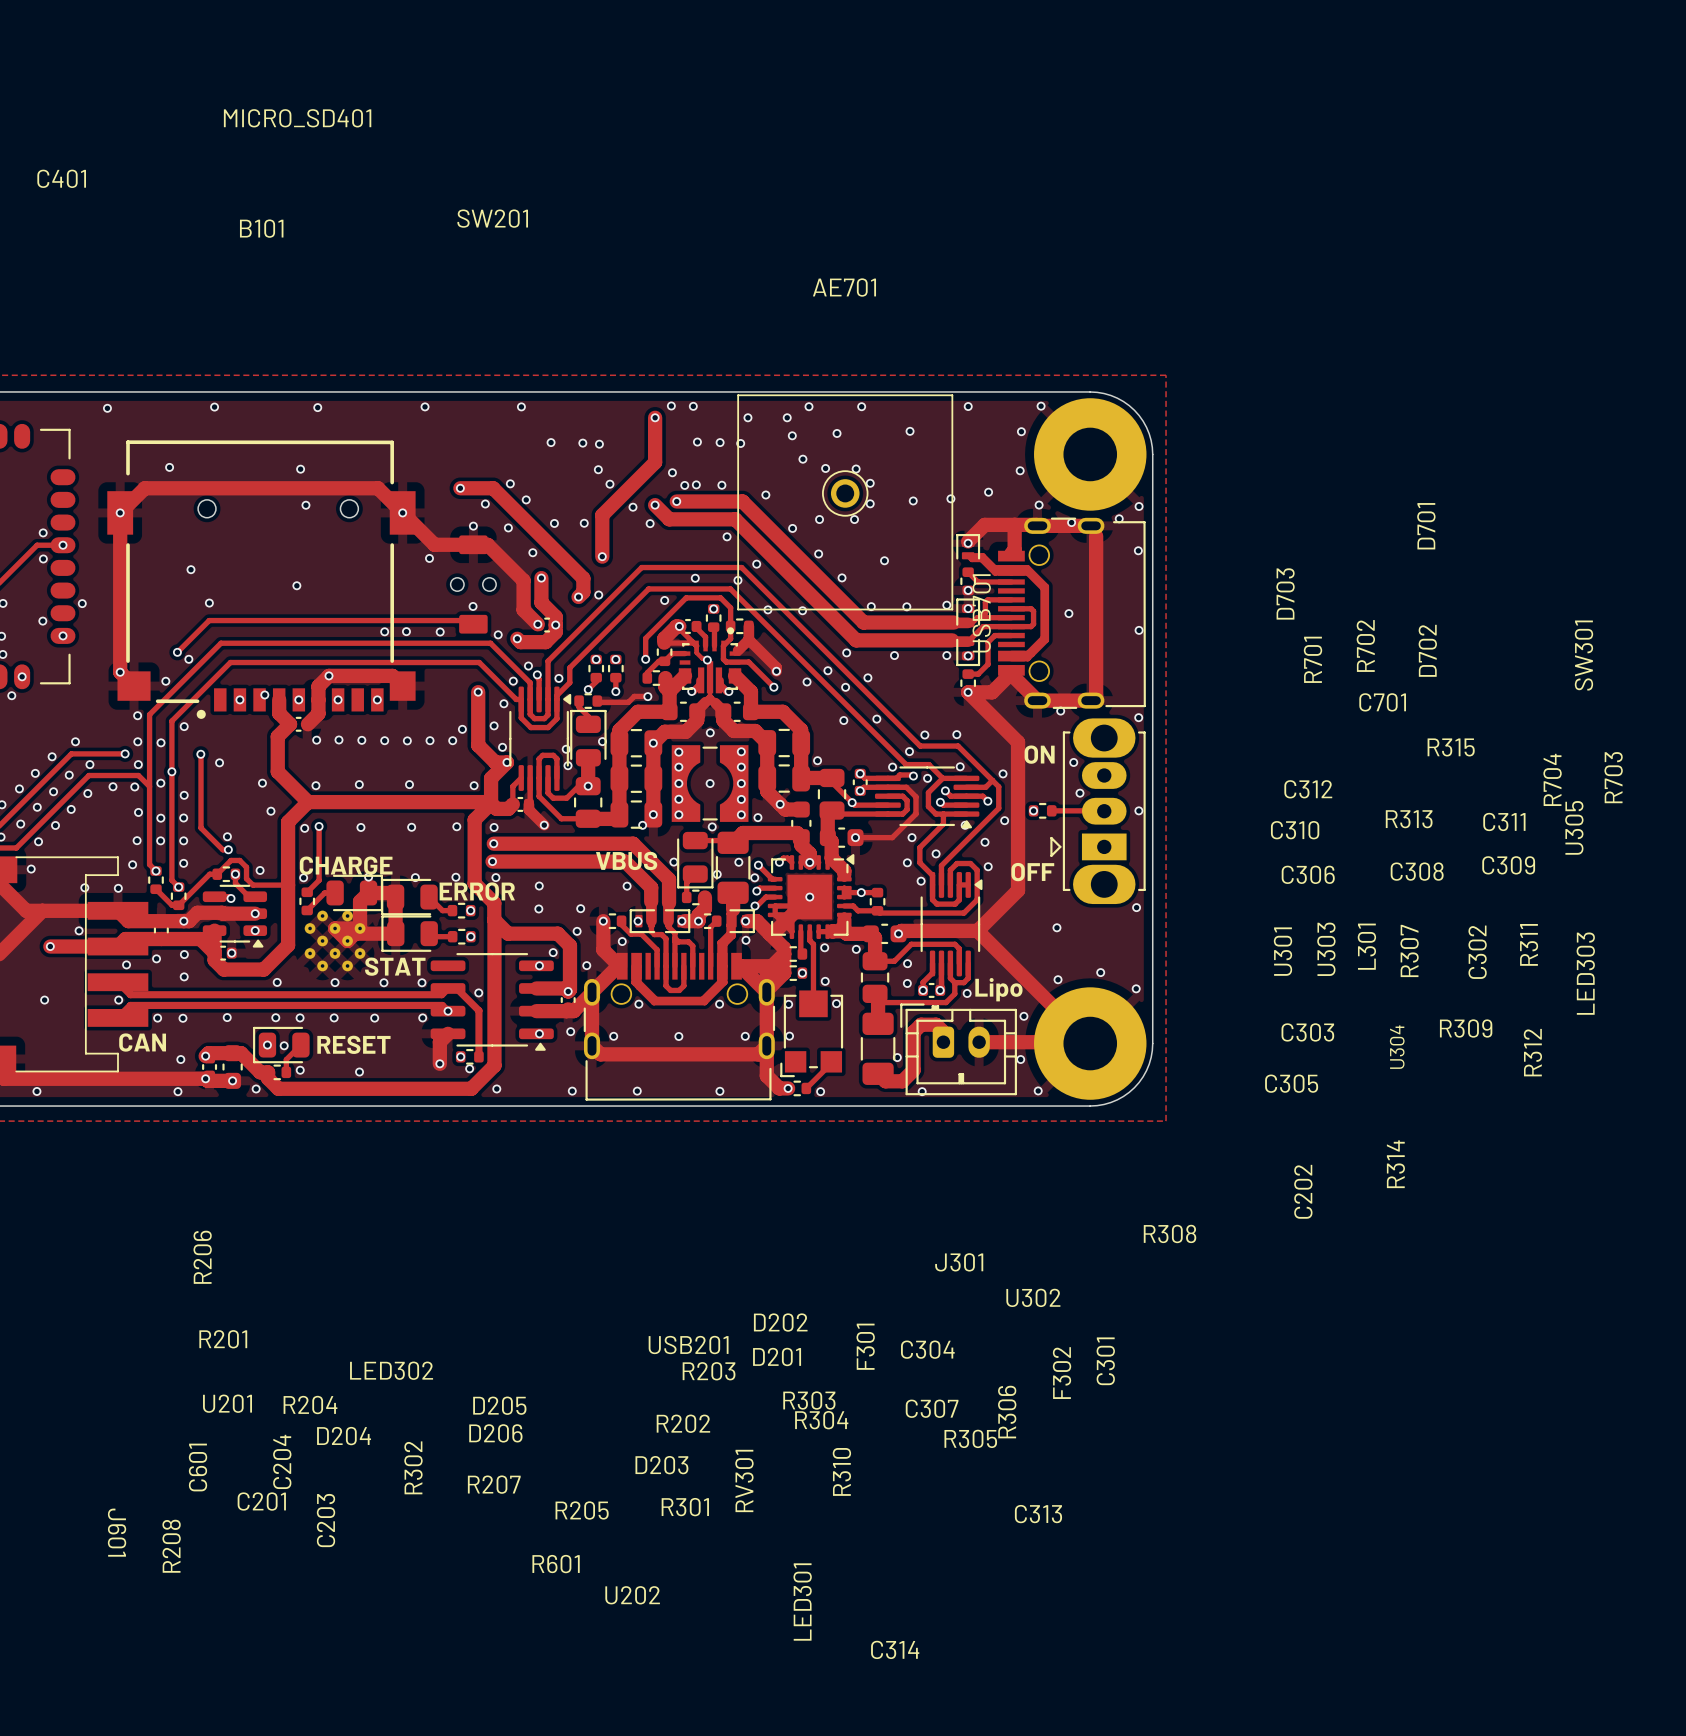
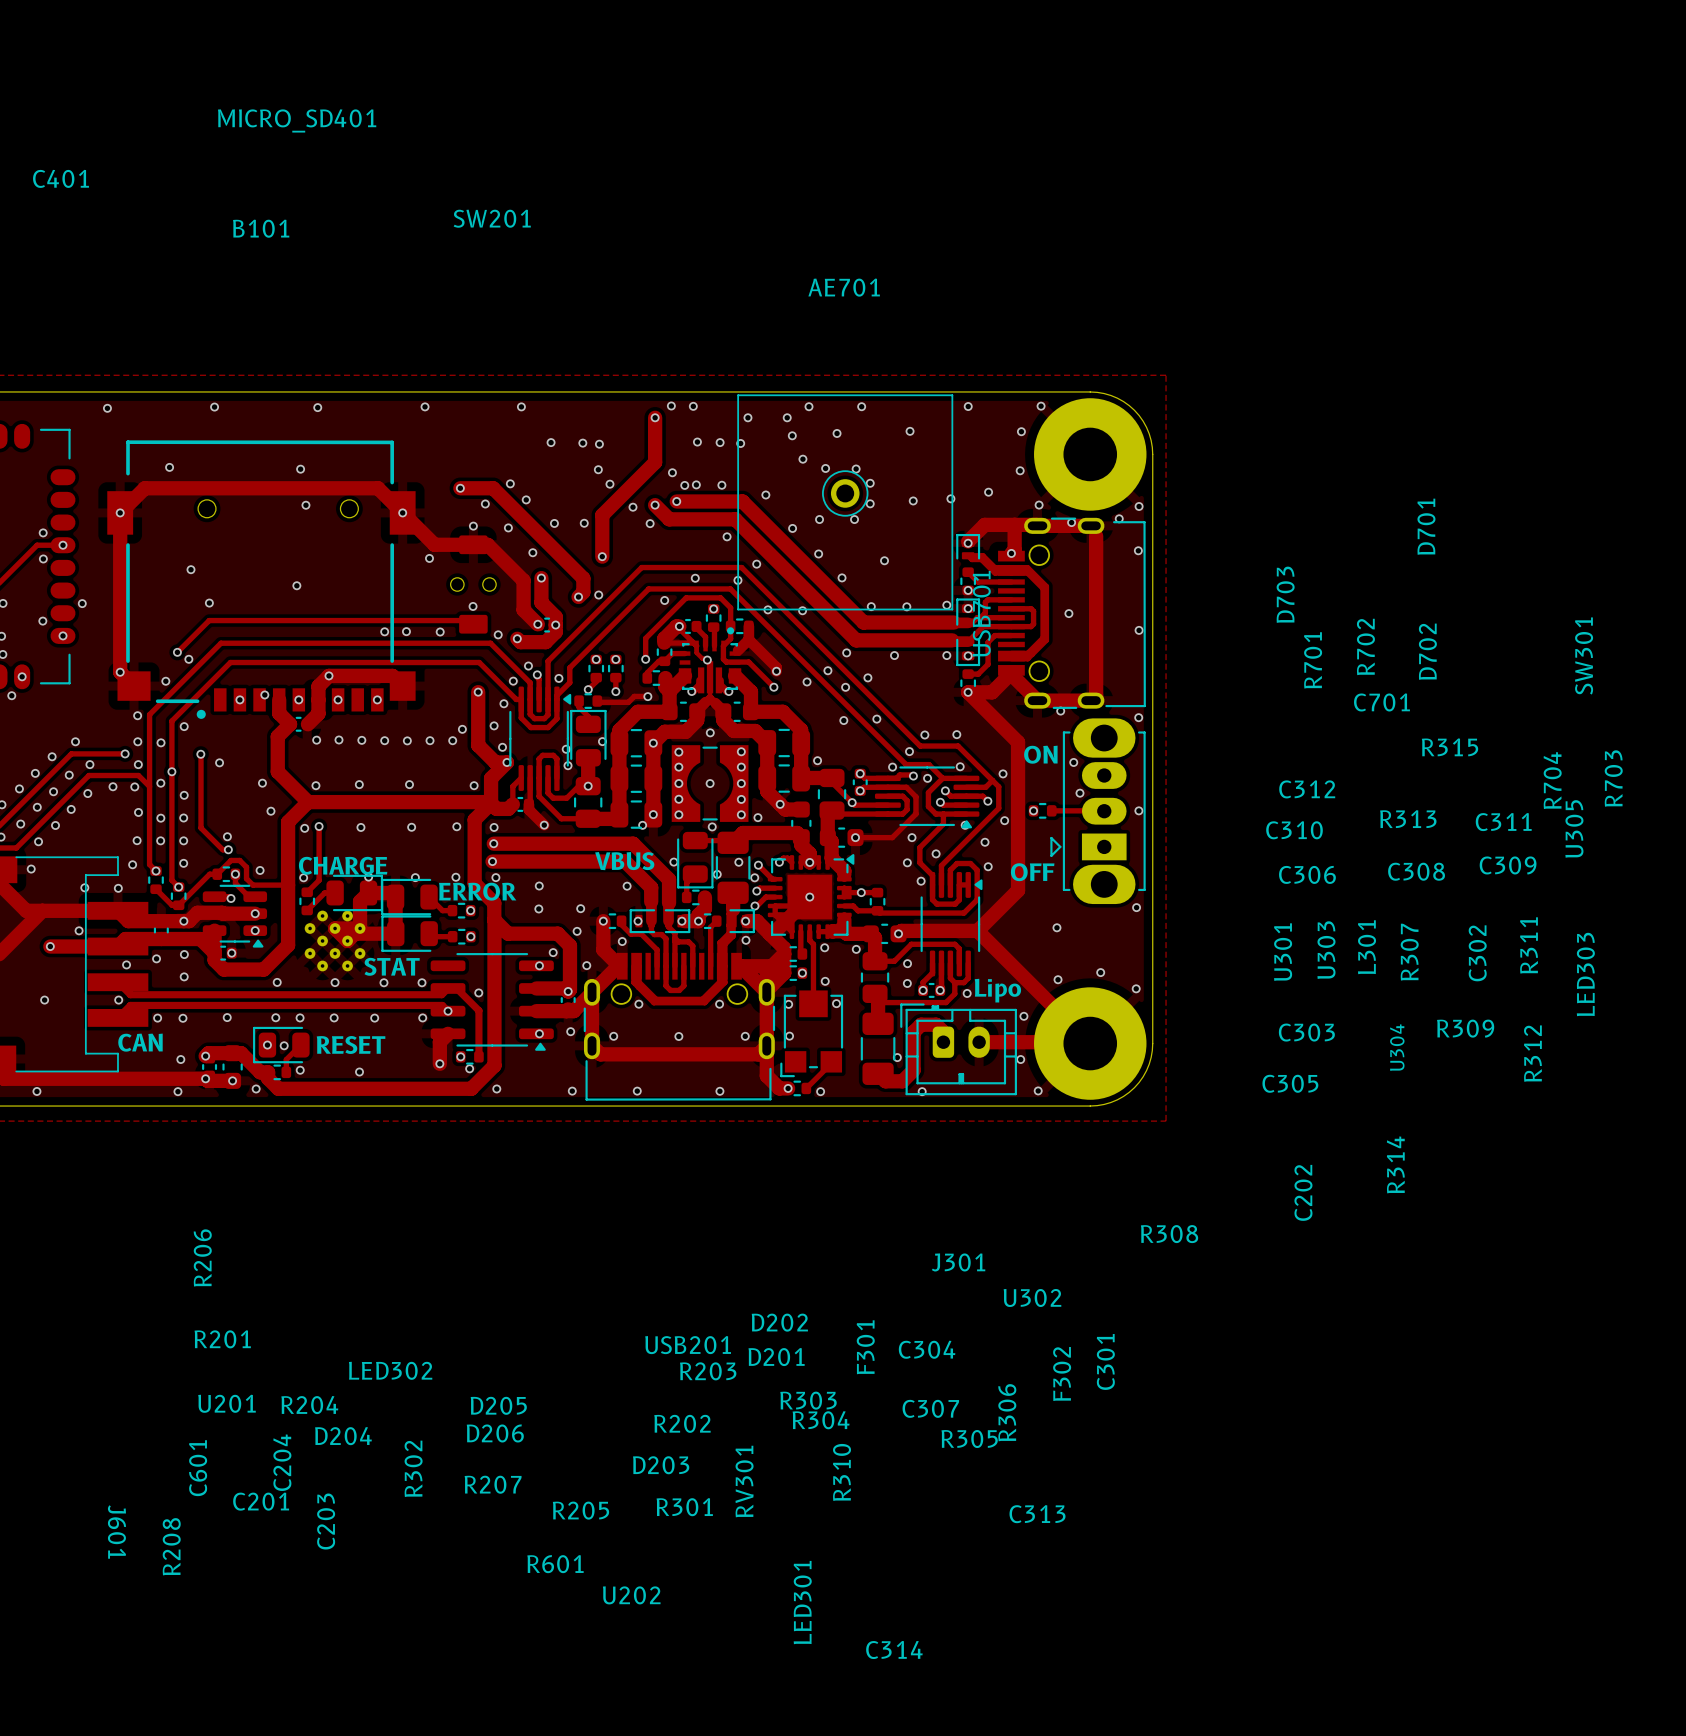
via: none -> (1011, 553)

